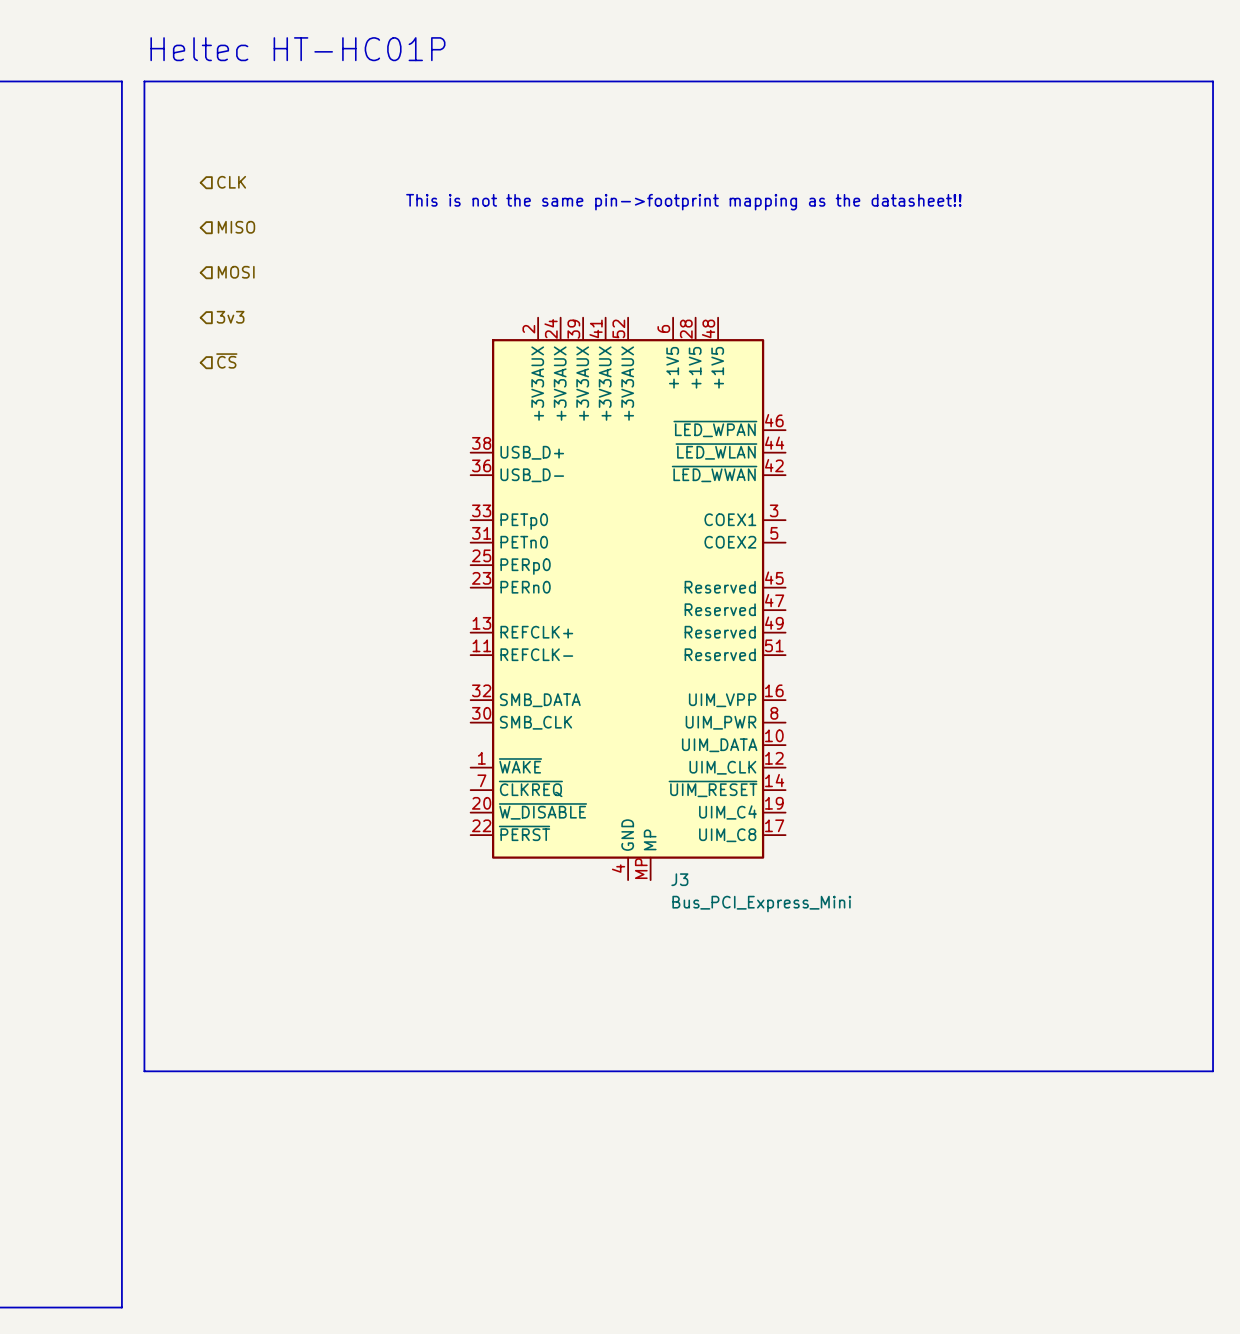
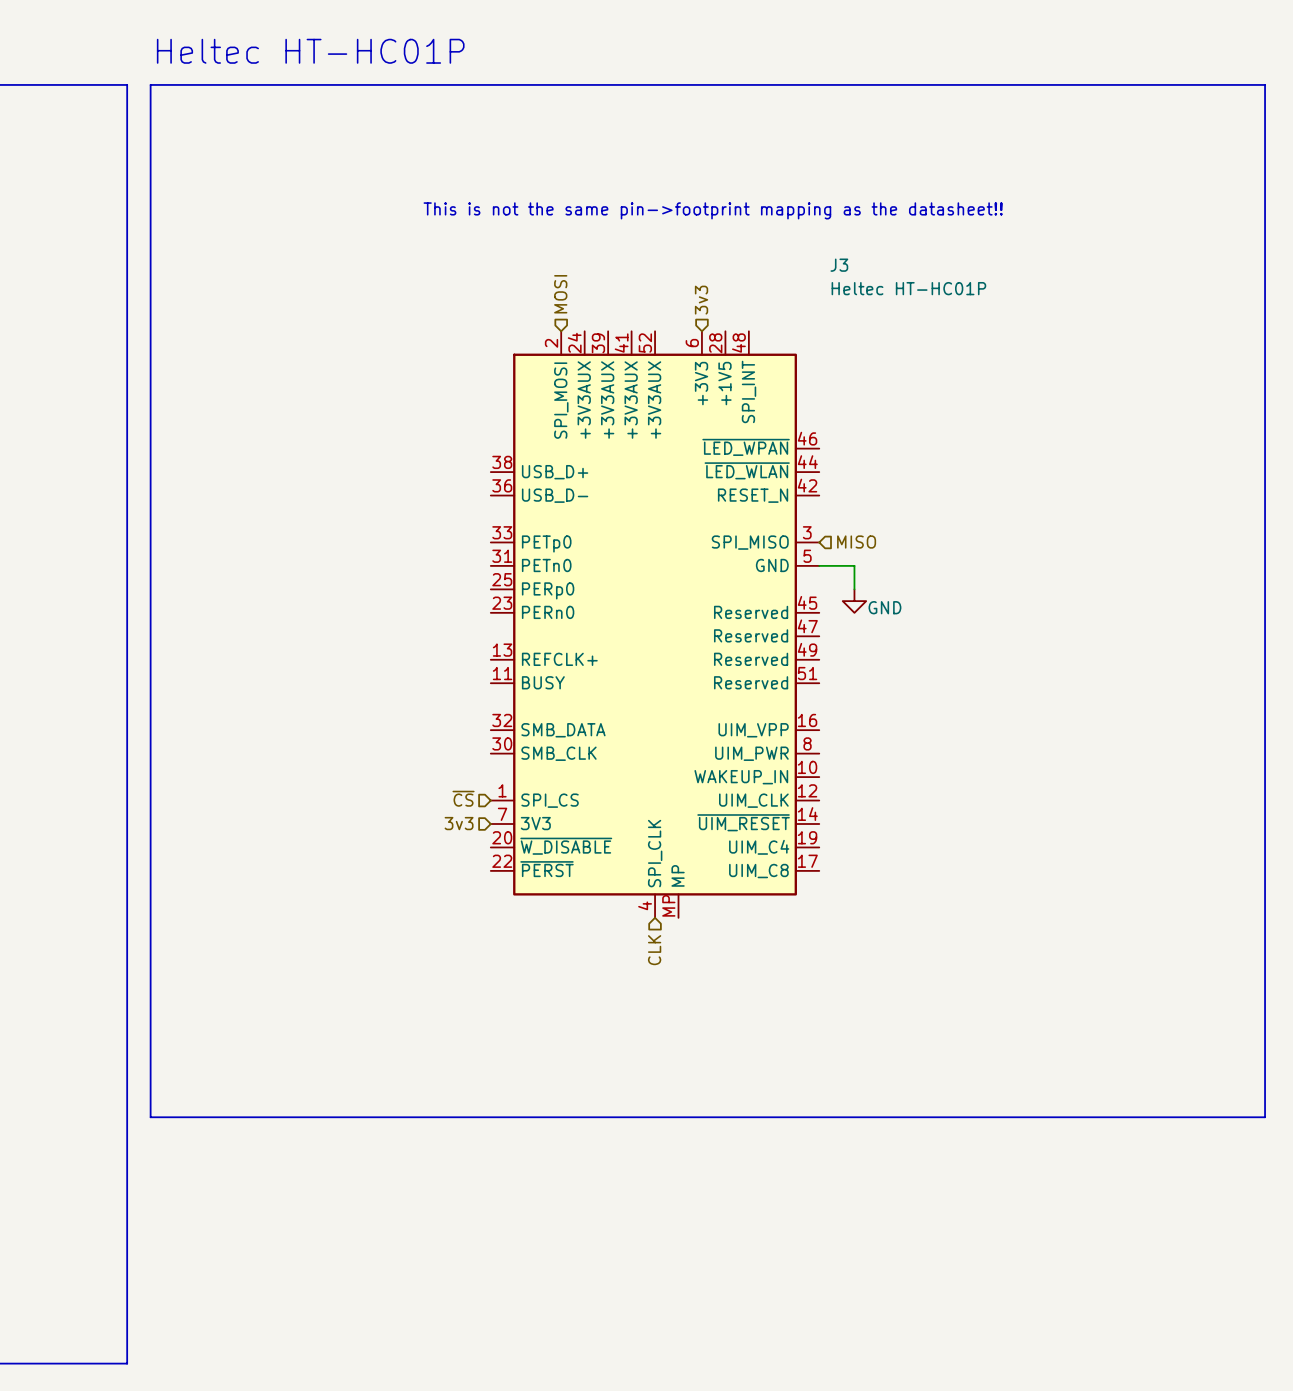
hierarchical label: CLK (231, 182) -> none
hierarchical label: MISO (236, 227) -> none
hierarchical label: MOSI (236, 272) -> none
hierarchical label: none -> MOSI (560, 294)
hierarchical label: none -> 3v3 (701, 300)
hierarchical label: 3v3 (230, 317) -> none
J3 symbol: [470, 317, 786, 881] -> [490, 331, 820, 918]
hierarchical label: ~{CS} (226, 360) -> none
hierarchical label: none -> MISO (856, 542)
wire: none -> (819, 565) (854, 565) (854, 589)
power symbol: none -> GND (854, 601)
hierarchical label: none -> ~{CS} (463, 798)
hierarchical label: none -> 3v3 (459, 823)
J3 name position: J3 (679, 879) -> J3 (839, 265)
J3 value: Bus_PCI_Express_Mini (761, 904) -> Heltec HT-HC01P (908, 288)
hierarchical label: none -> CLK (654, 950)

